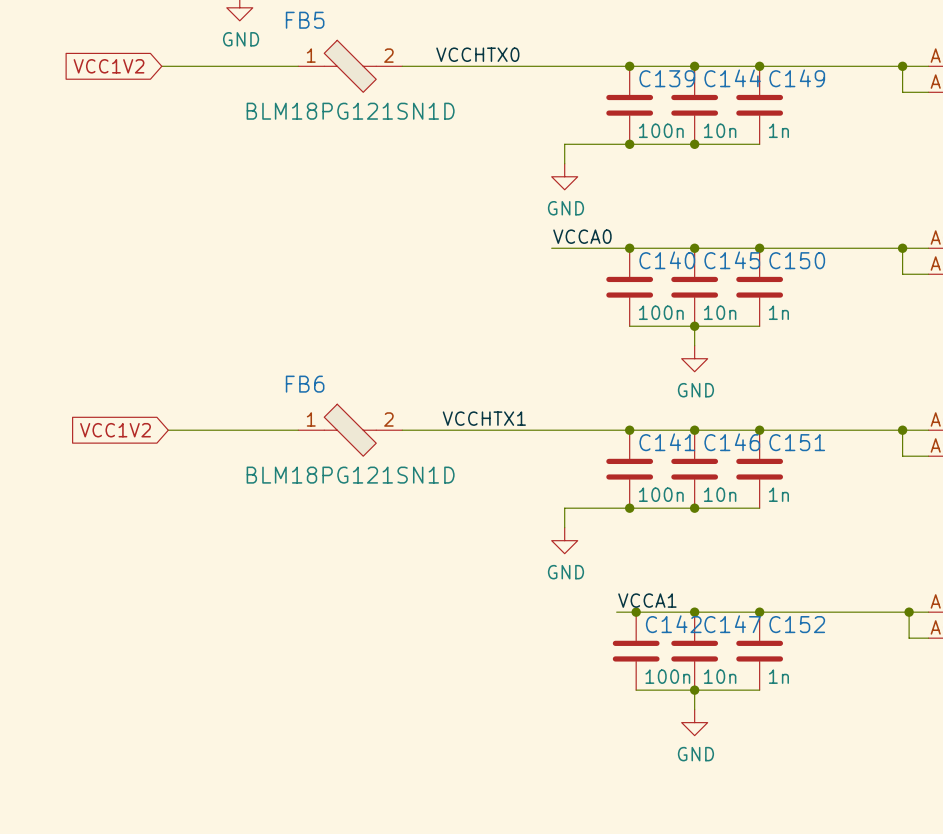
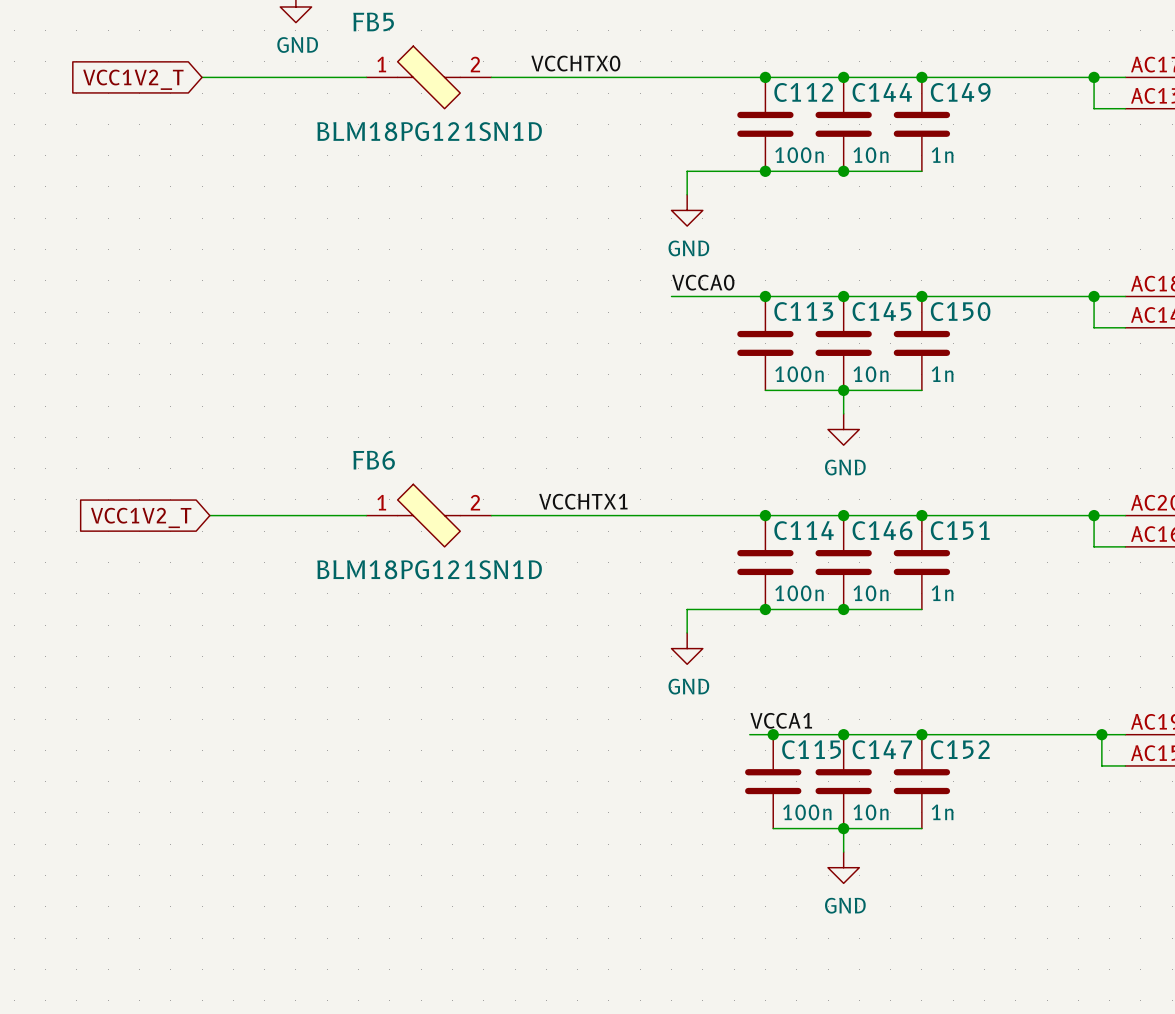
global label: VCC1V2 (109, 66) -> VCC1V2_T (133, 79)
C139 name: C139 (667, 78) -> C112 (803, 92)
C140 name: C140 (667, 260) -> C113 (803, 311)
global label: VCC1V2 (115, 430) -> VCC1V2_T (141, 517)
C141 name: C141 (667, 442) -> C114 (804, 530)
C142 name: C142 (673, 624) -> C115 (811, 749)

